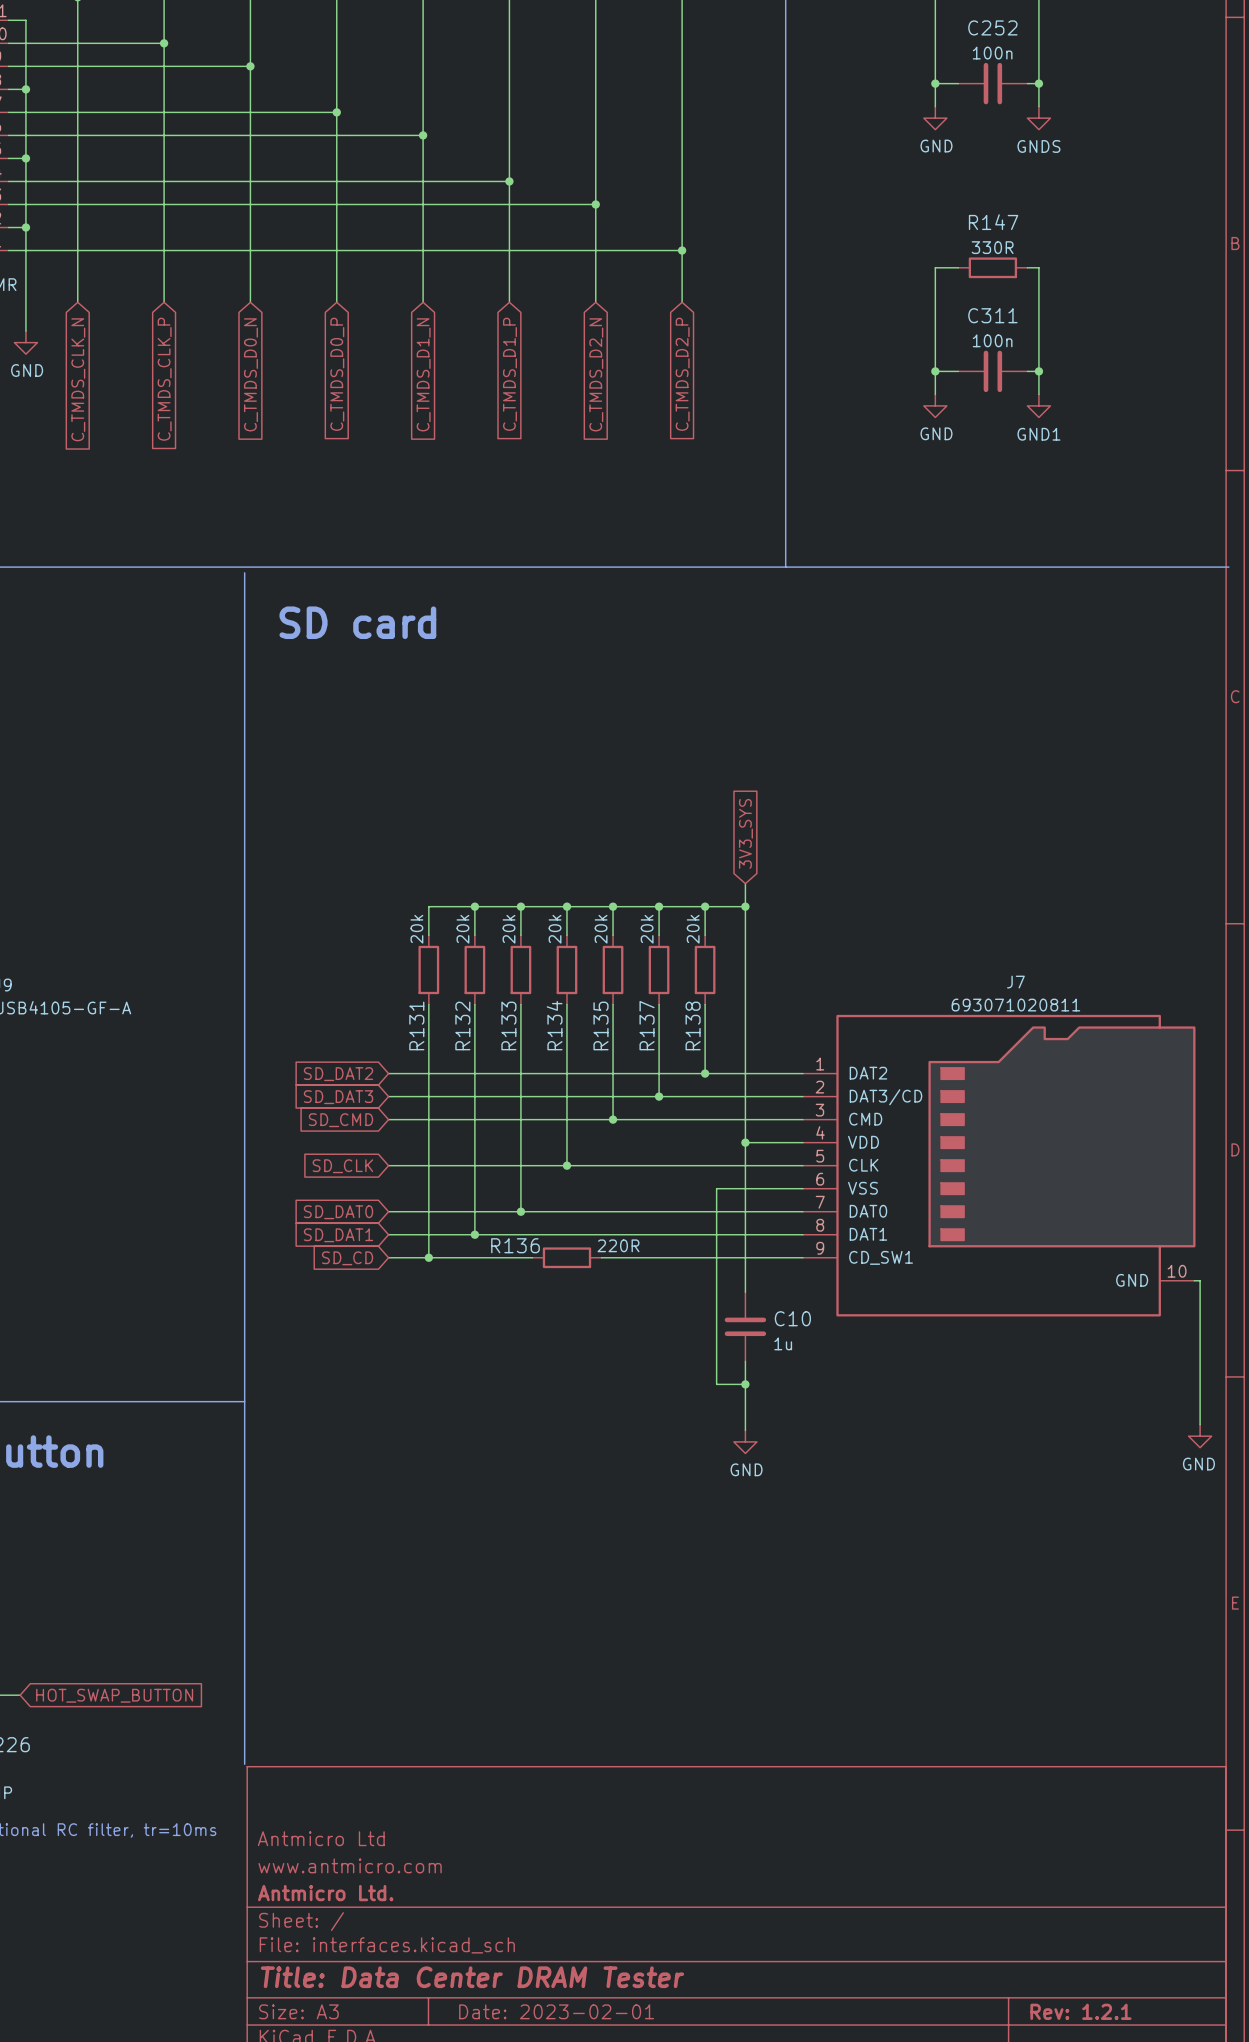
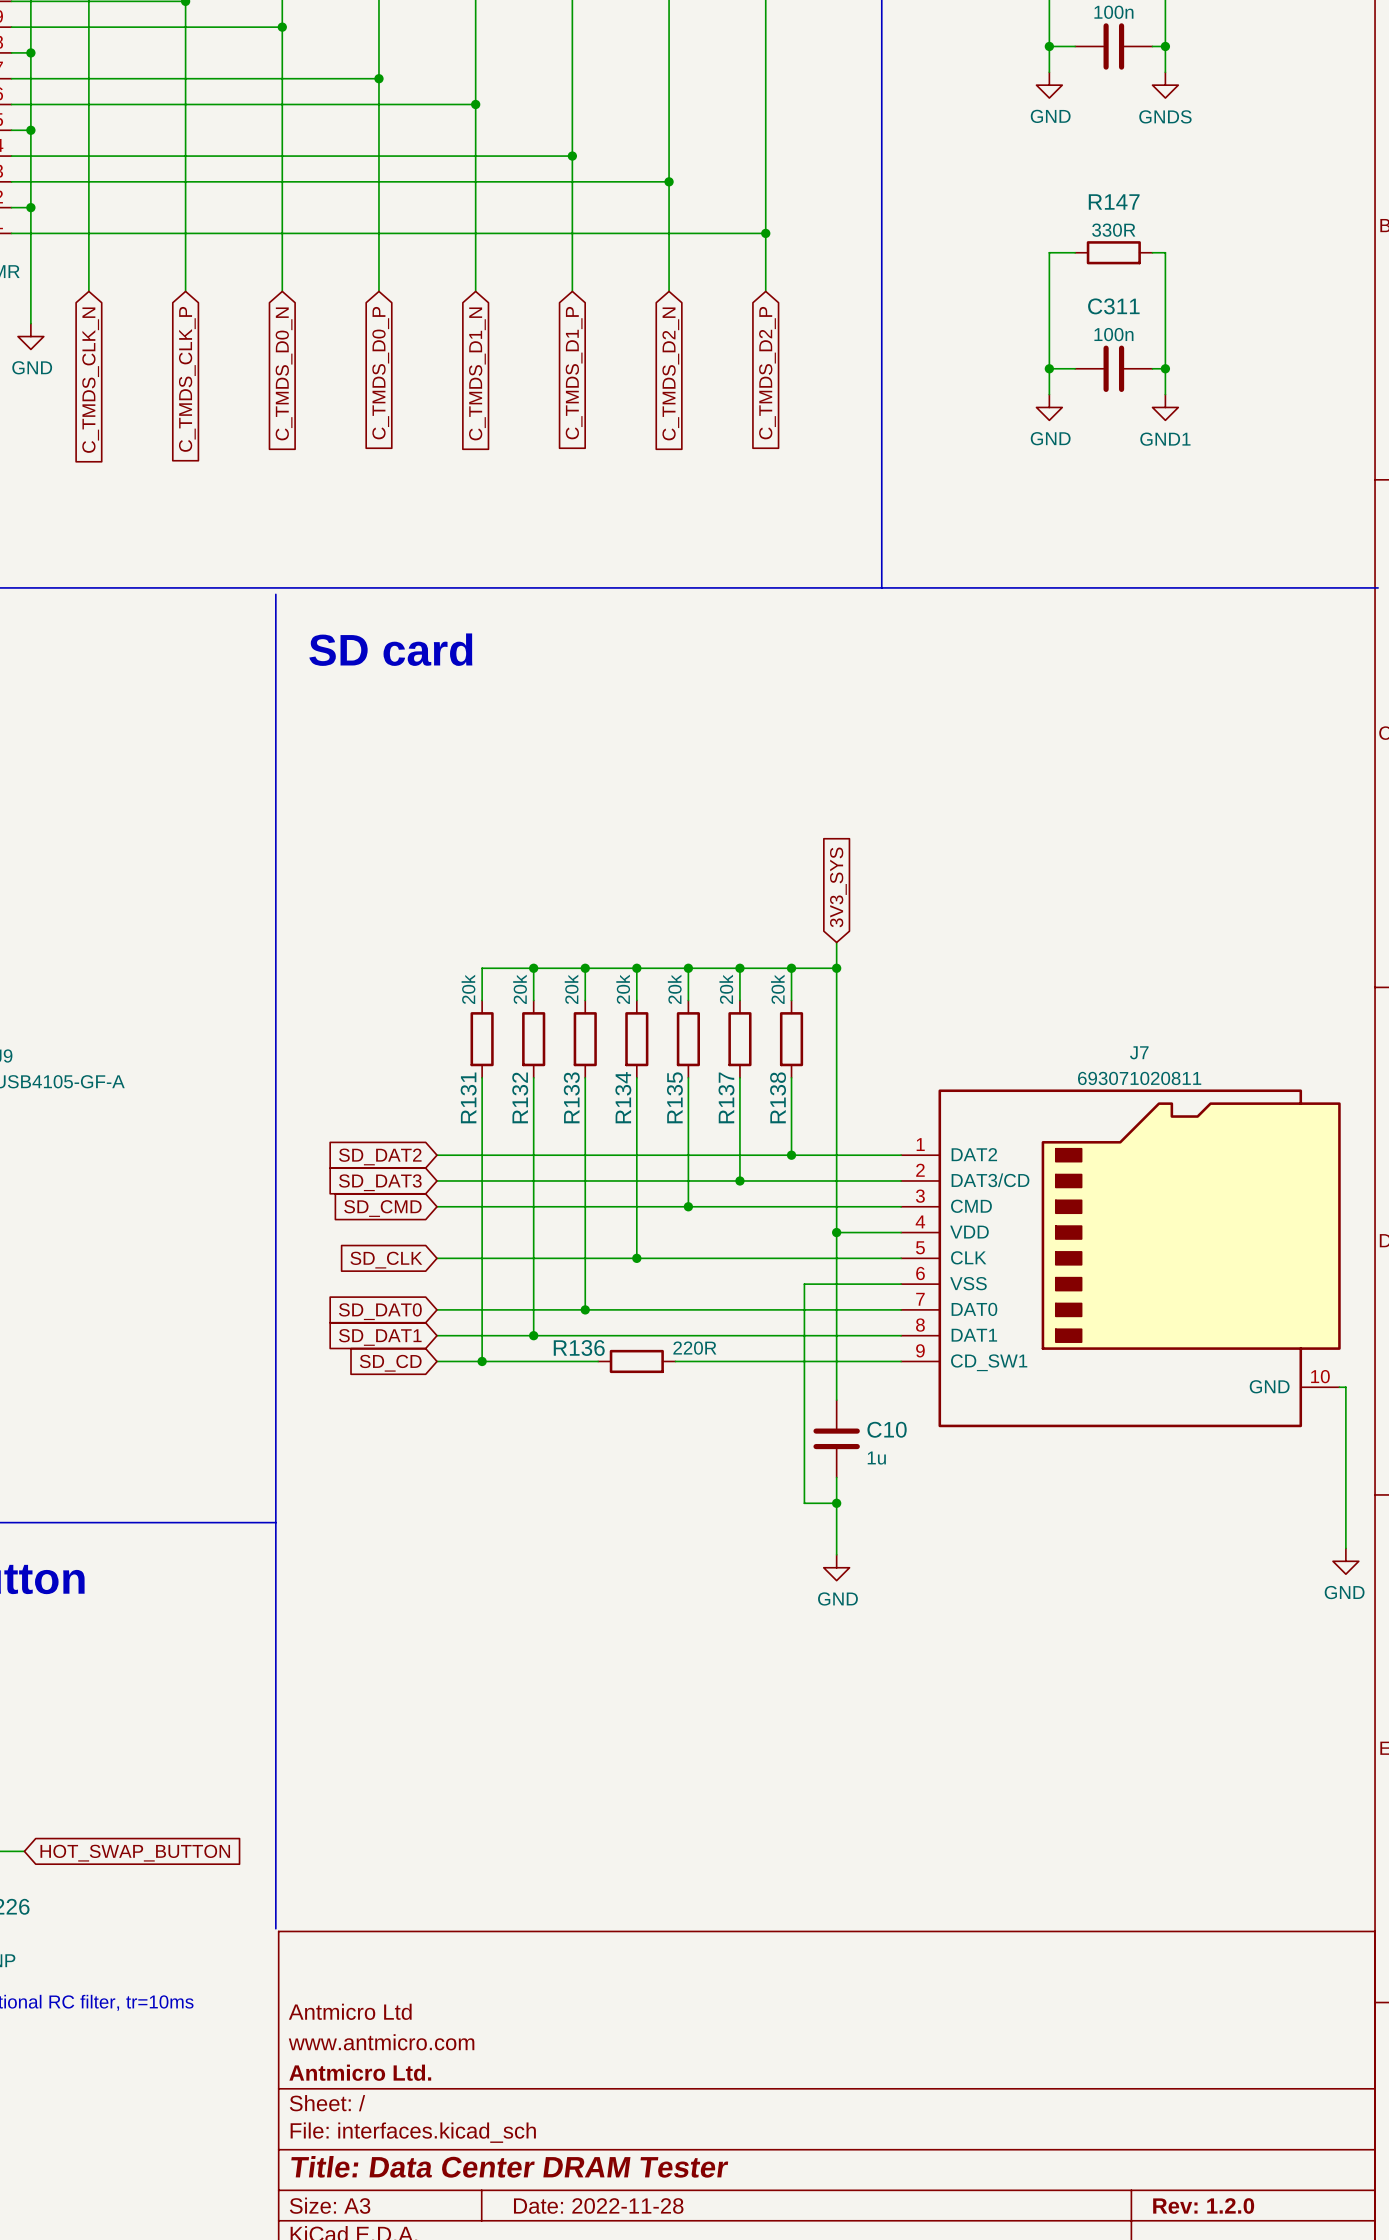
title block: Date: 2023-02-01 (556, 2011) -> Date: 2022-11-28 (598, 2205)
title block: Rev: 1.2.1 (1080, 2011) -> Rev: 1.2.0 (1203, 2205)

